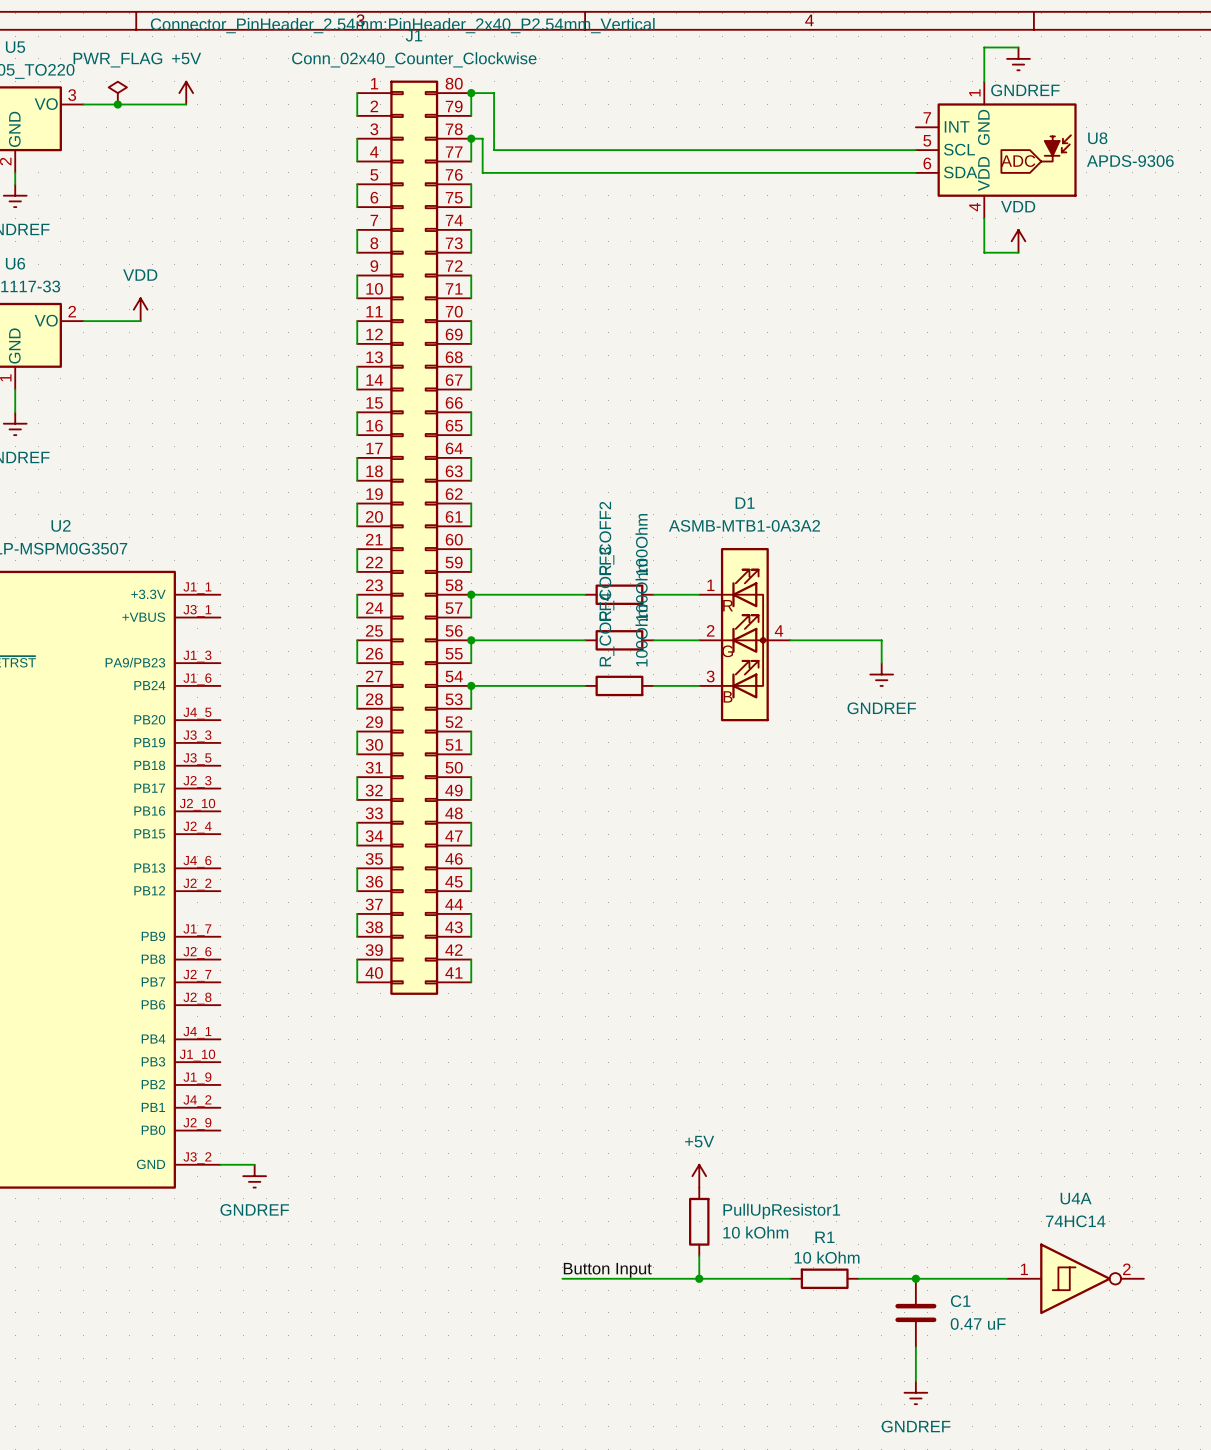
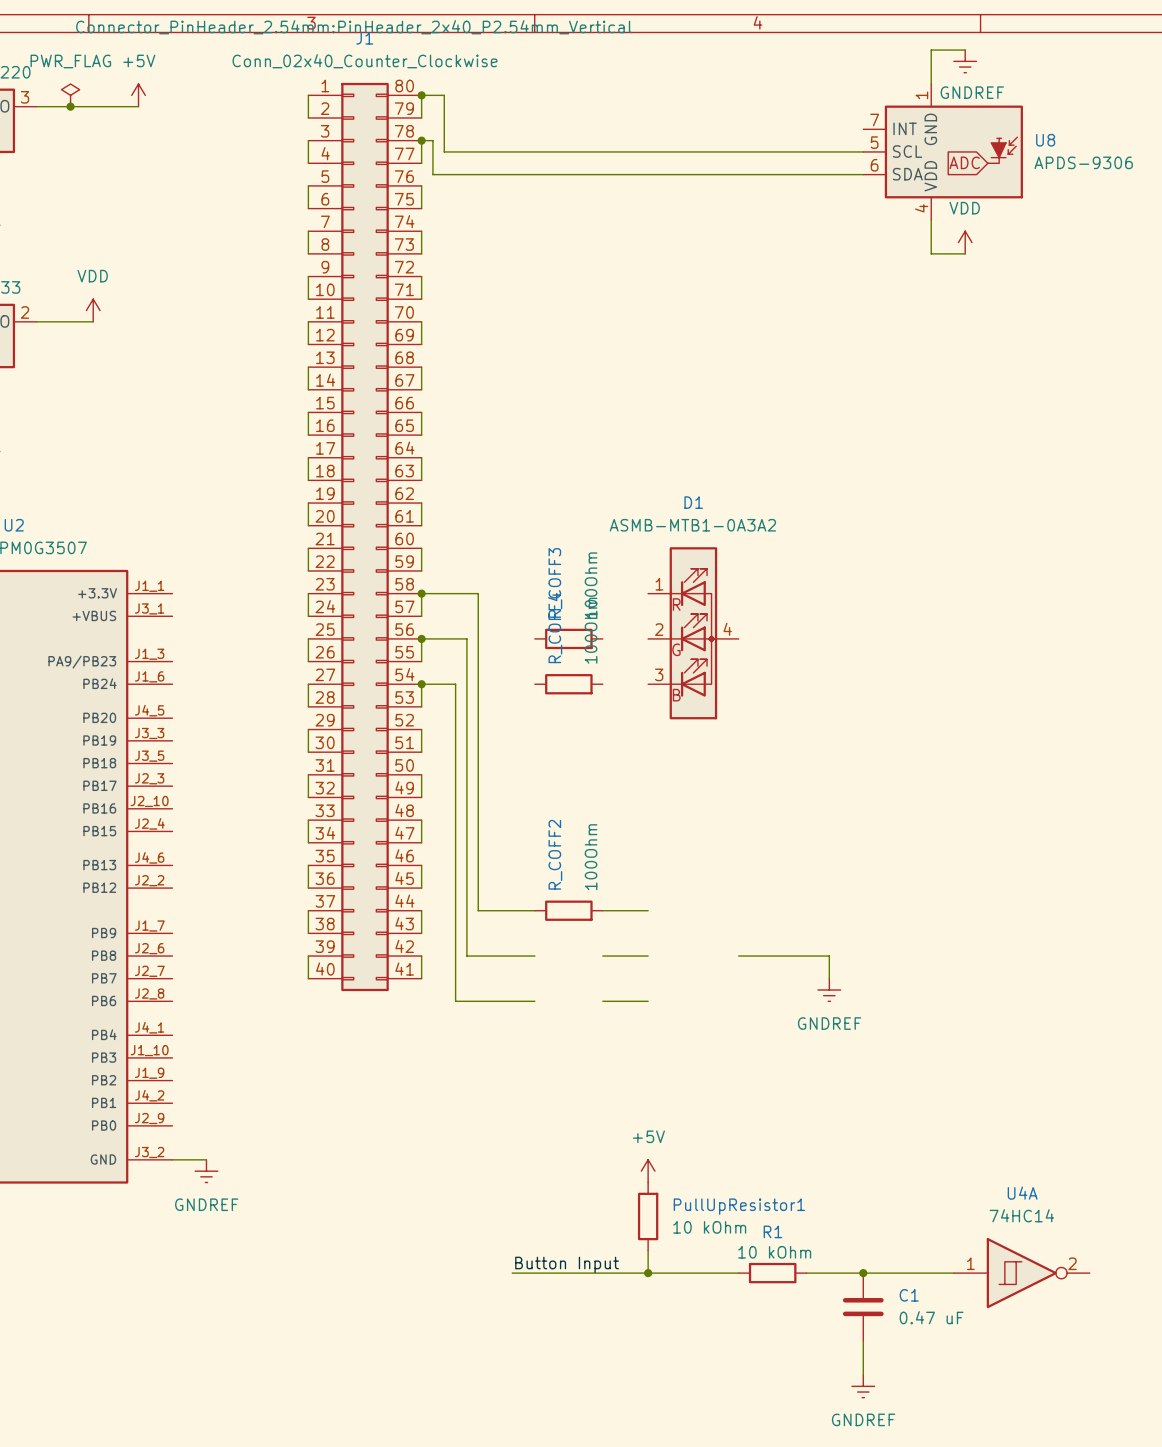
wire: (528, 594) (585, 594) -> (478, 593) (478, 910) (534, 910)
R_COFF2 position: (619, 594) -> (568, 910)
wire: (653, 594) (699, 594) -> none
wire: (516, 640) (585, 640) -> (466, 638) (466, 956) (534, 956)
wire: (653, 640) (699, 640) -> none
wire: (790, 640) (881, 640) (881, 663) -> none
power symbol: GNDREF (881, 674) -> none
wire: (505, 685) (585, 685) -> (455, 684) (455, 1001) (534, 1001)
wire: (653, 685) (699, 685) -> none
wire: none -> (602, 910) (648, 910)
wire: none -> (602, 956) (648, 956)
wire: none -> (738, 956) (829, 956) (829, 978)
power symbol: none -> GNDREF (829, 989)
wire: none -> (602, 1001) (648, 1001)

